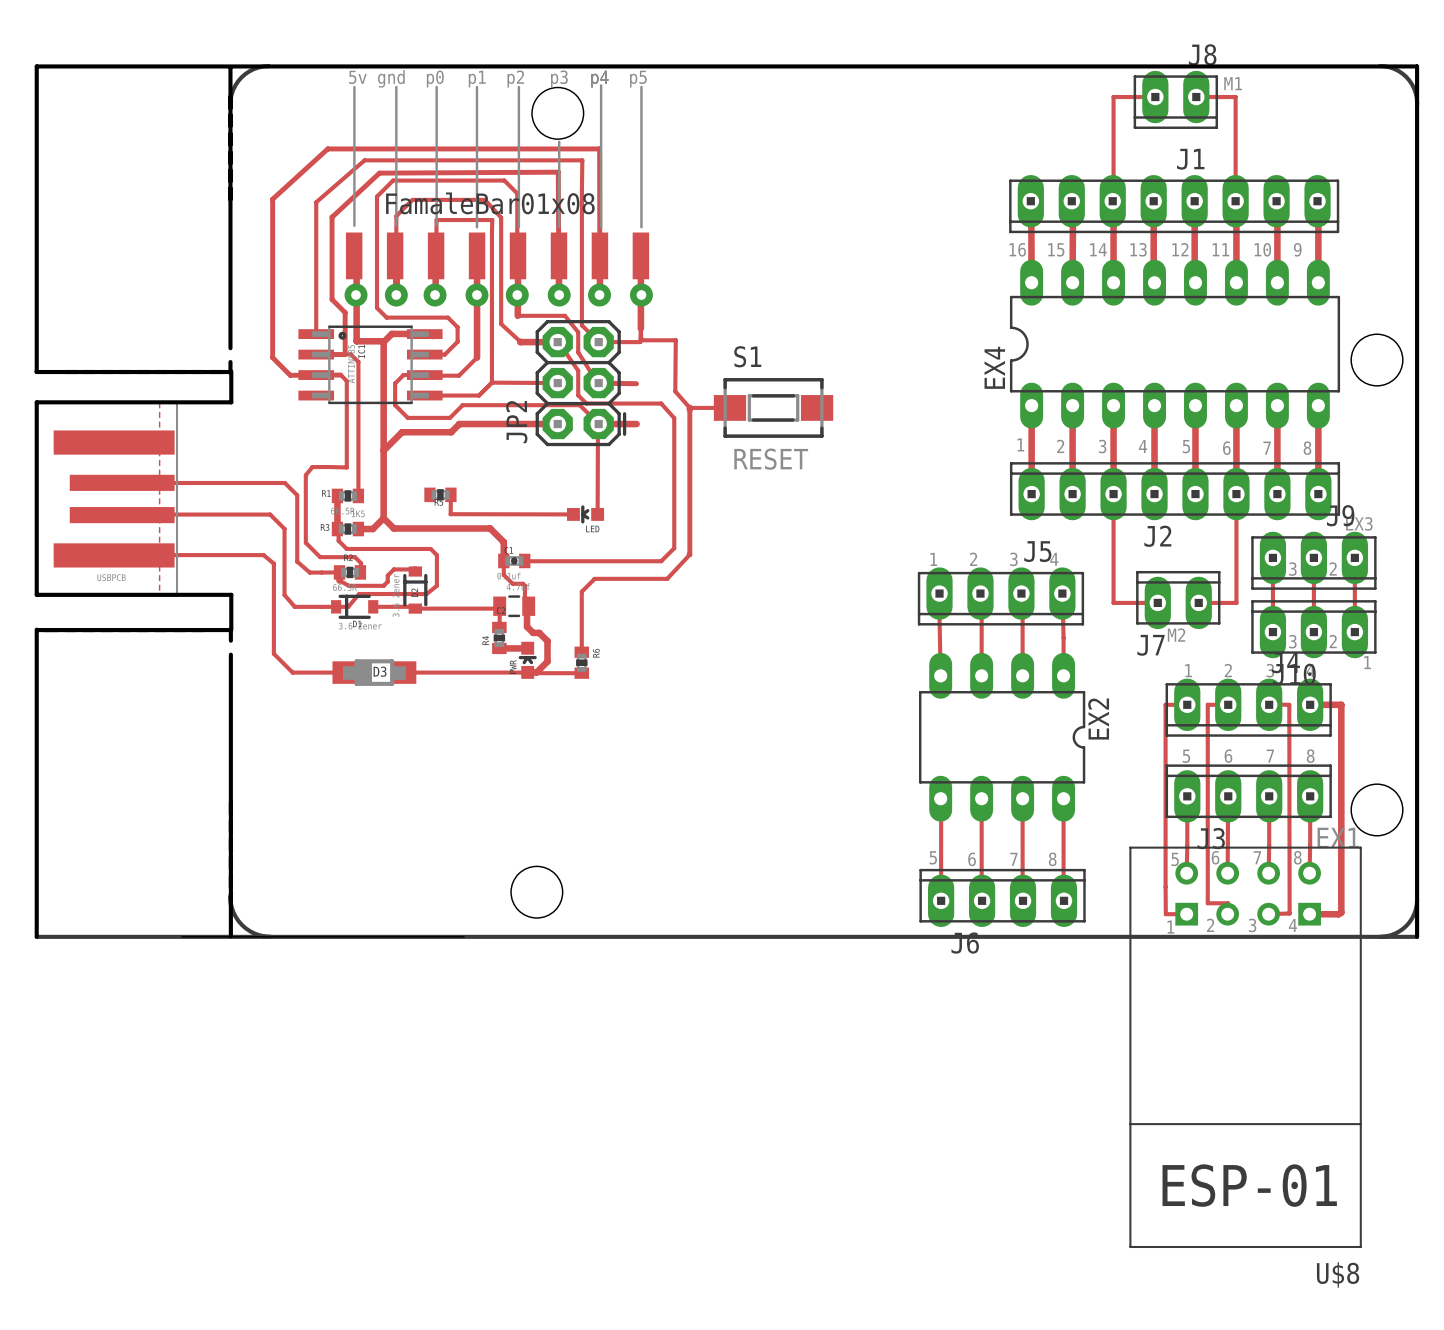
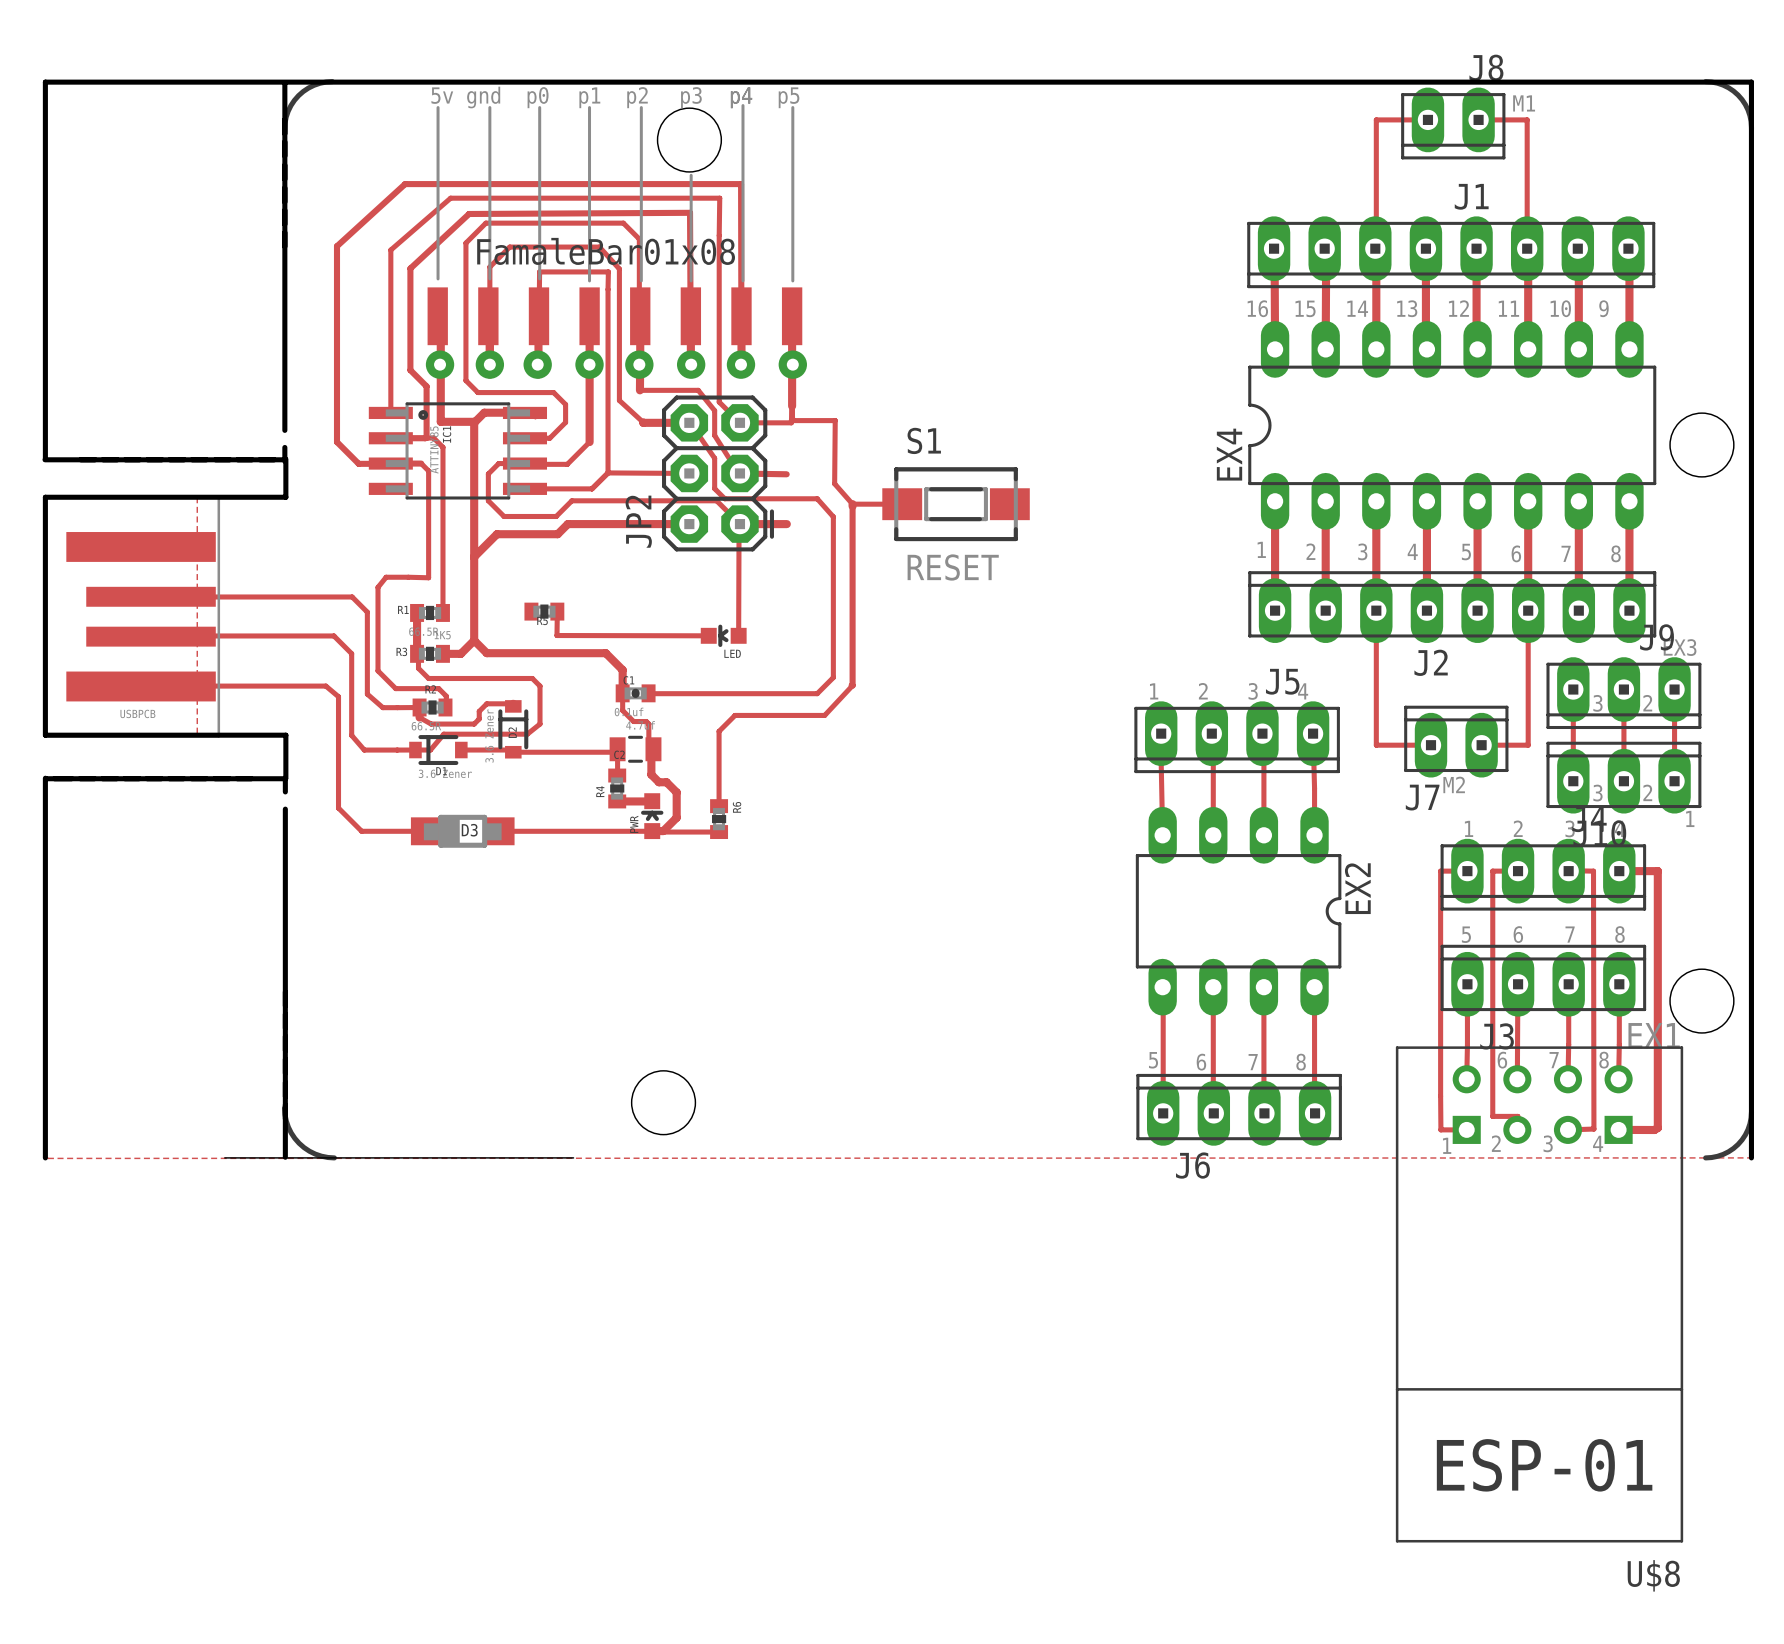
text: 5 (1175, 859) -> none
line: (36, 936) (1417, 936) -> none

